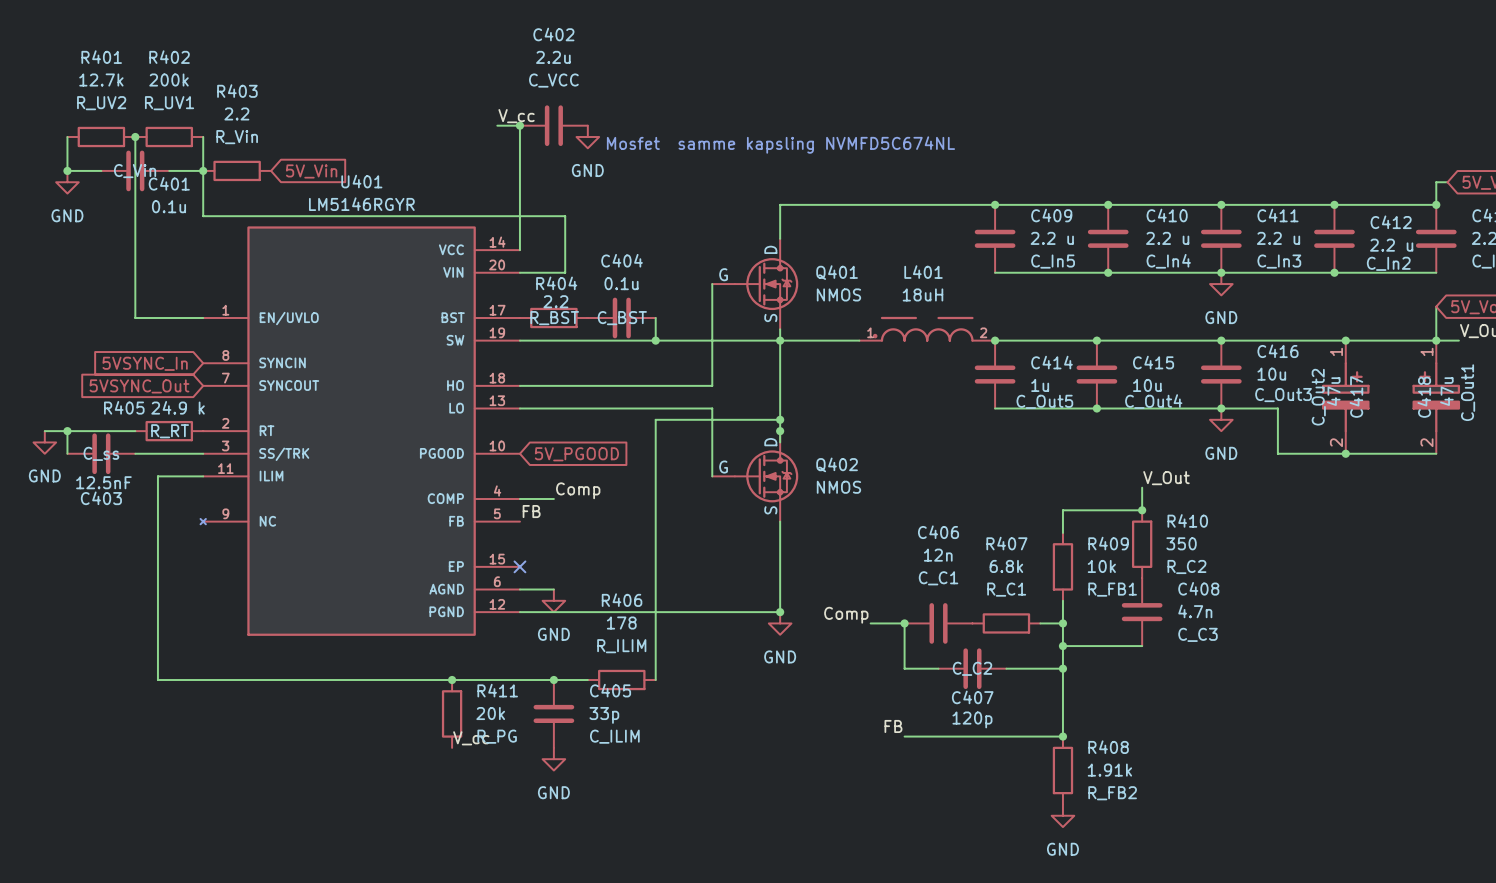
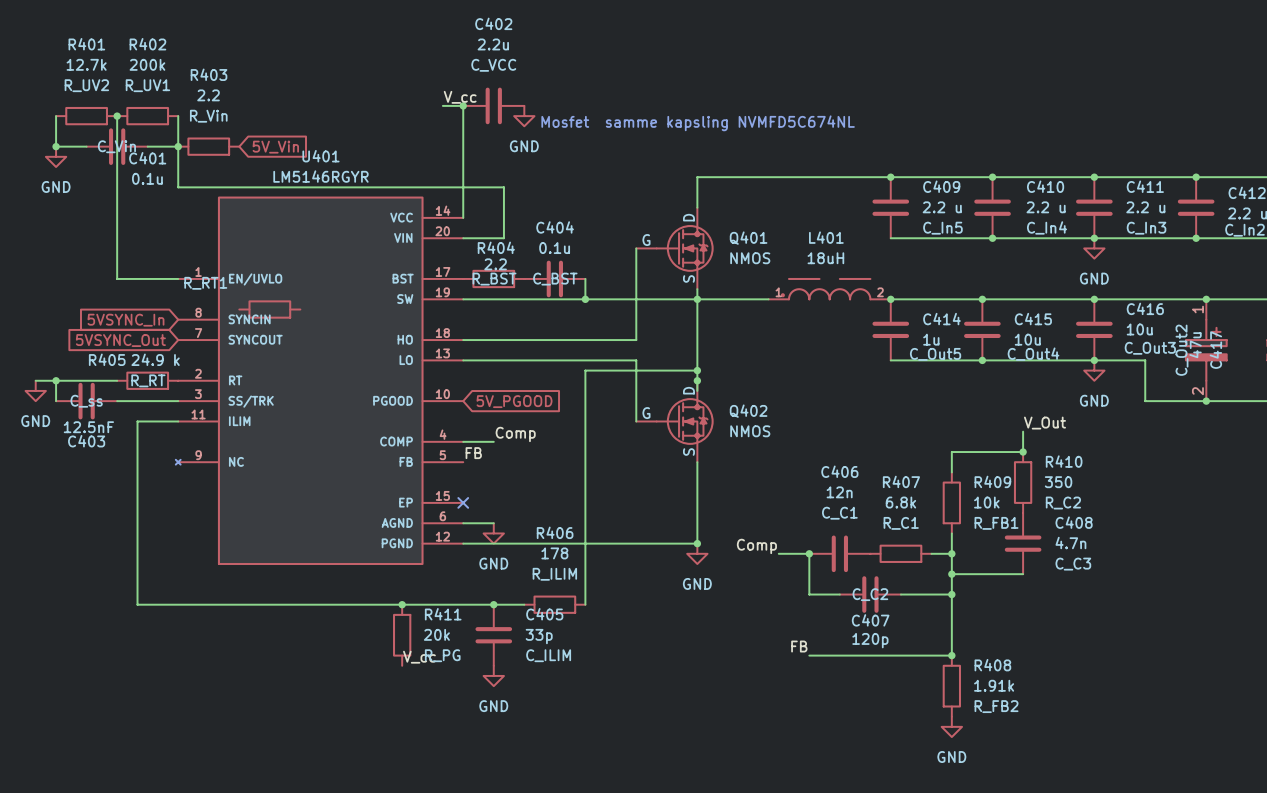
R_RT1: none -> (269, 309)

